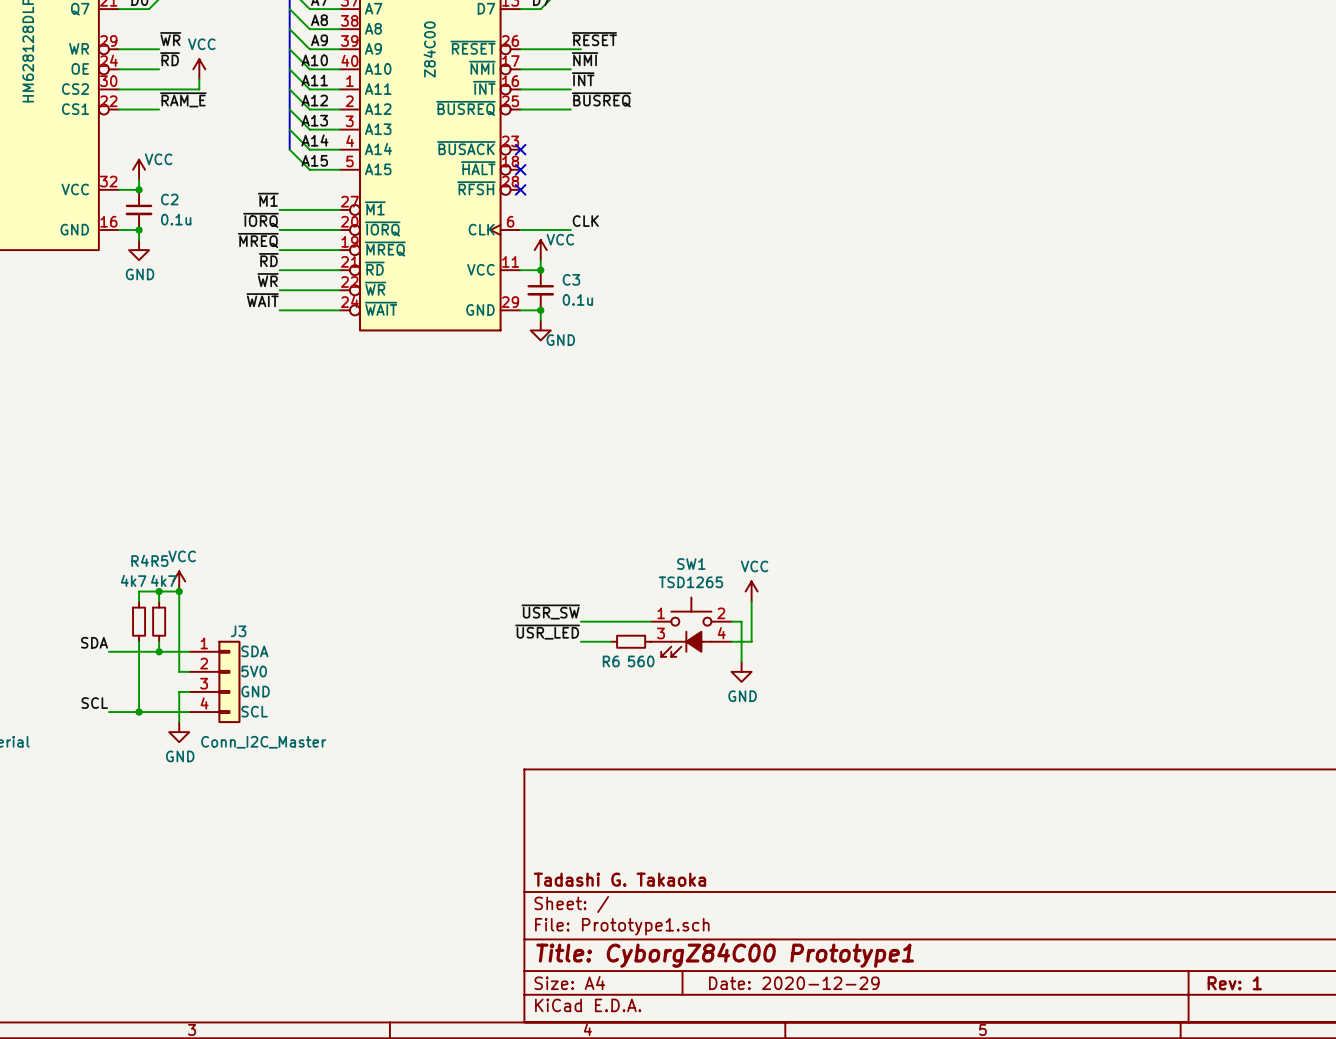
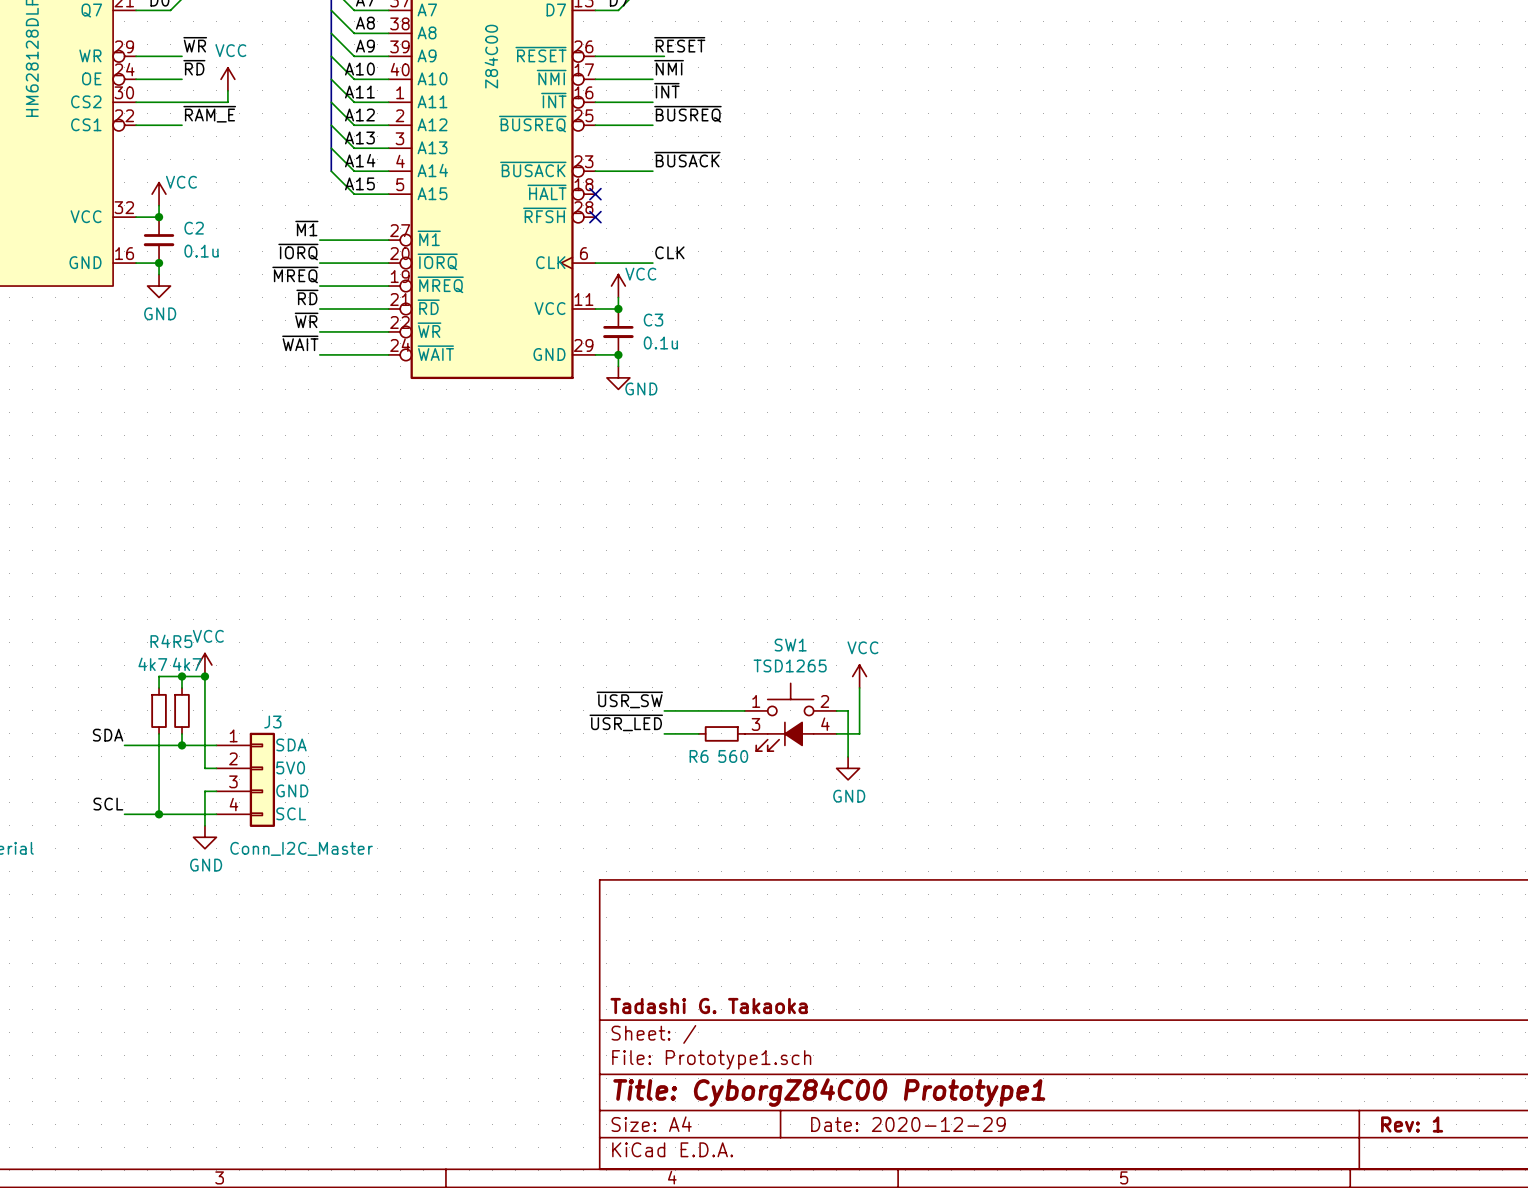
label: none -> ~{BUSACK} (687, 159)
wire: none -> (595, 171) (652, 171)
no-connect mark: (520, 149) -> none

